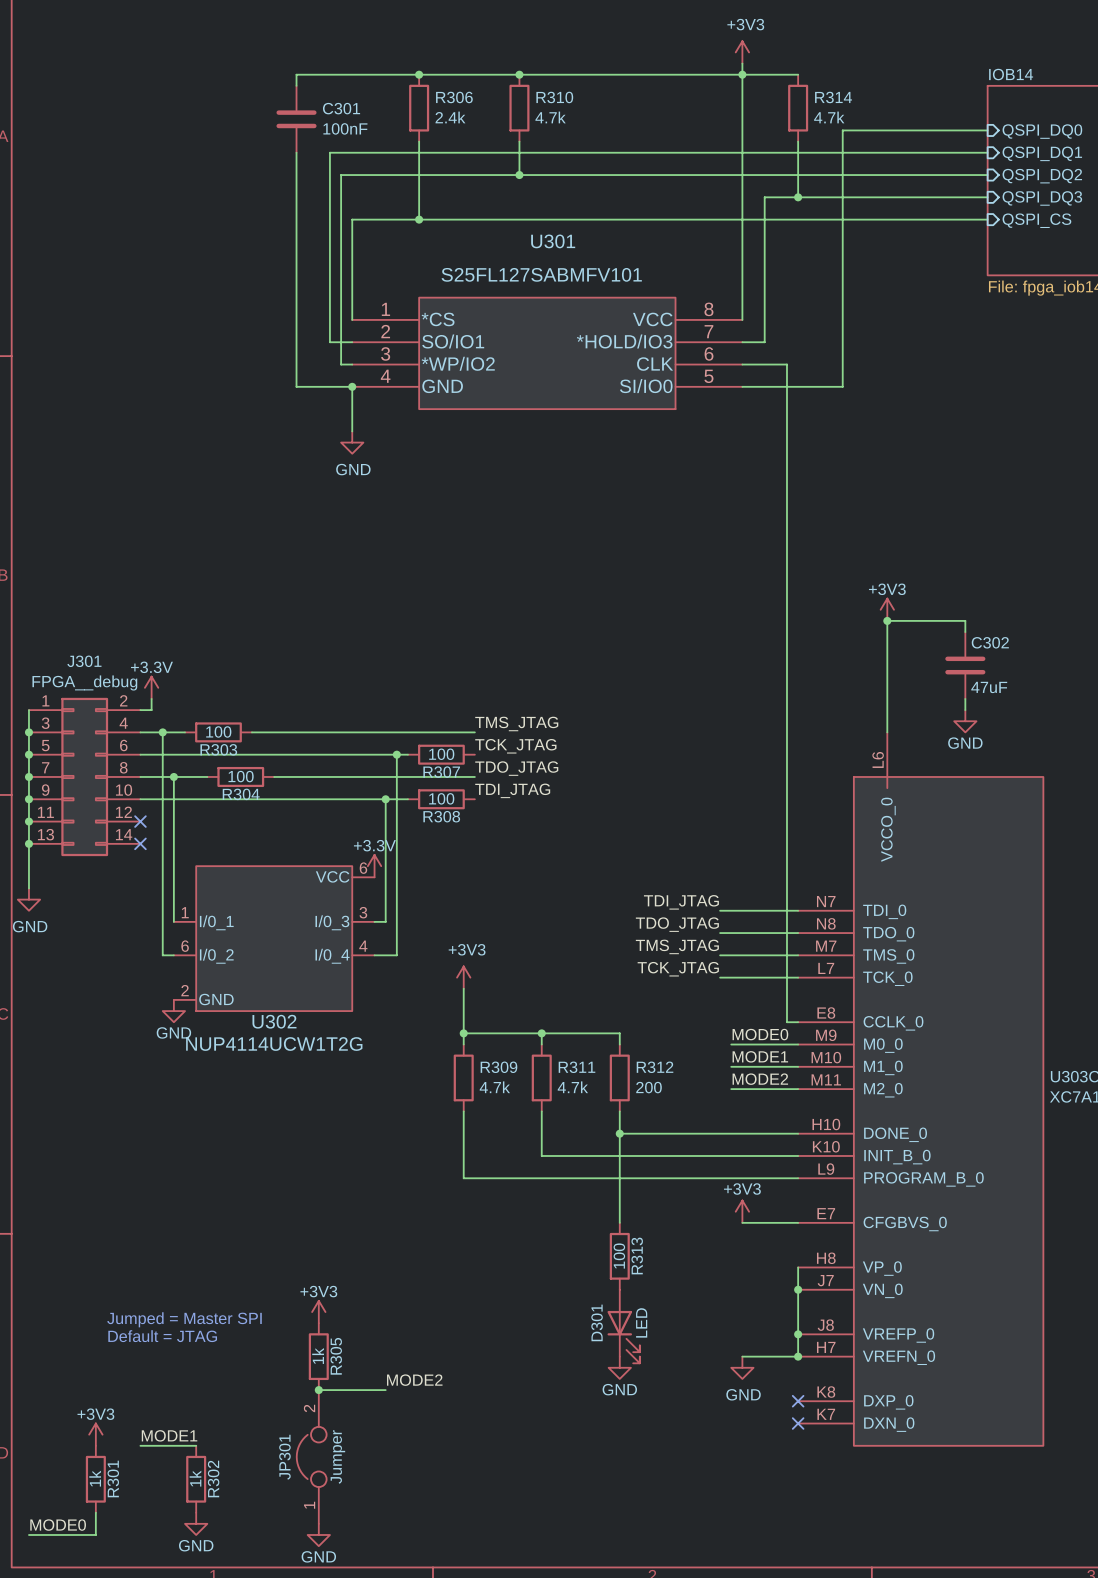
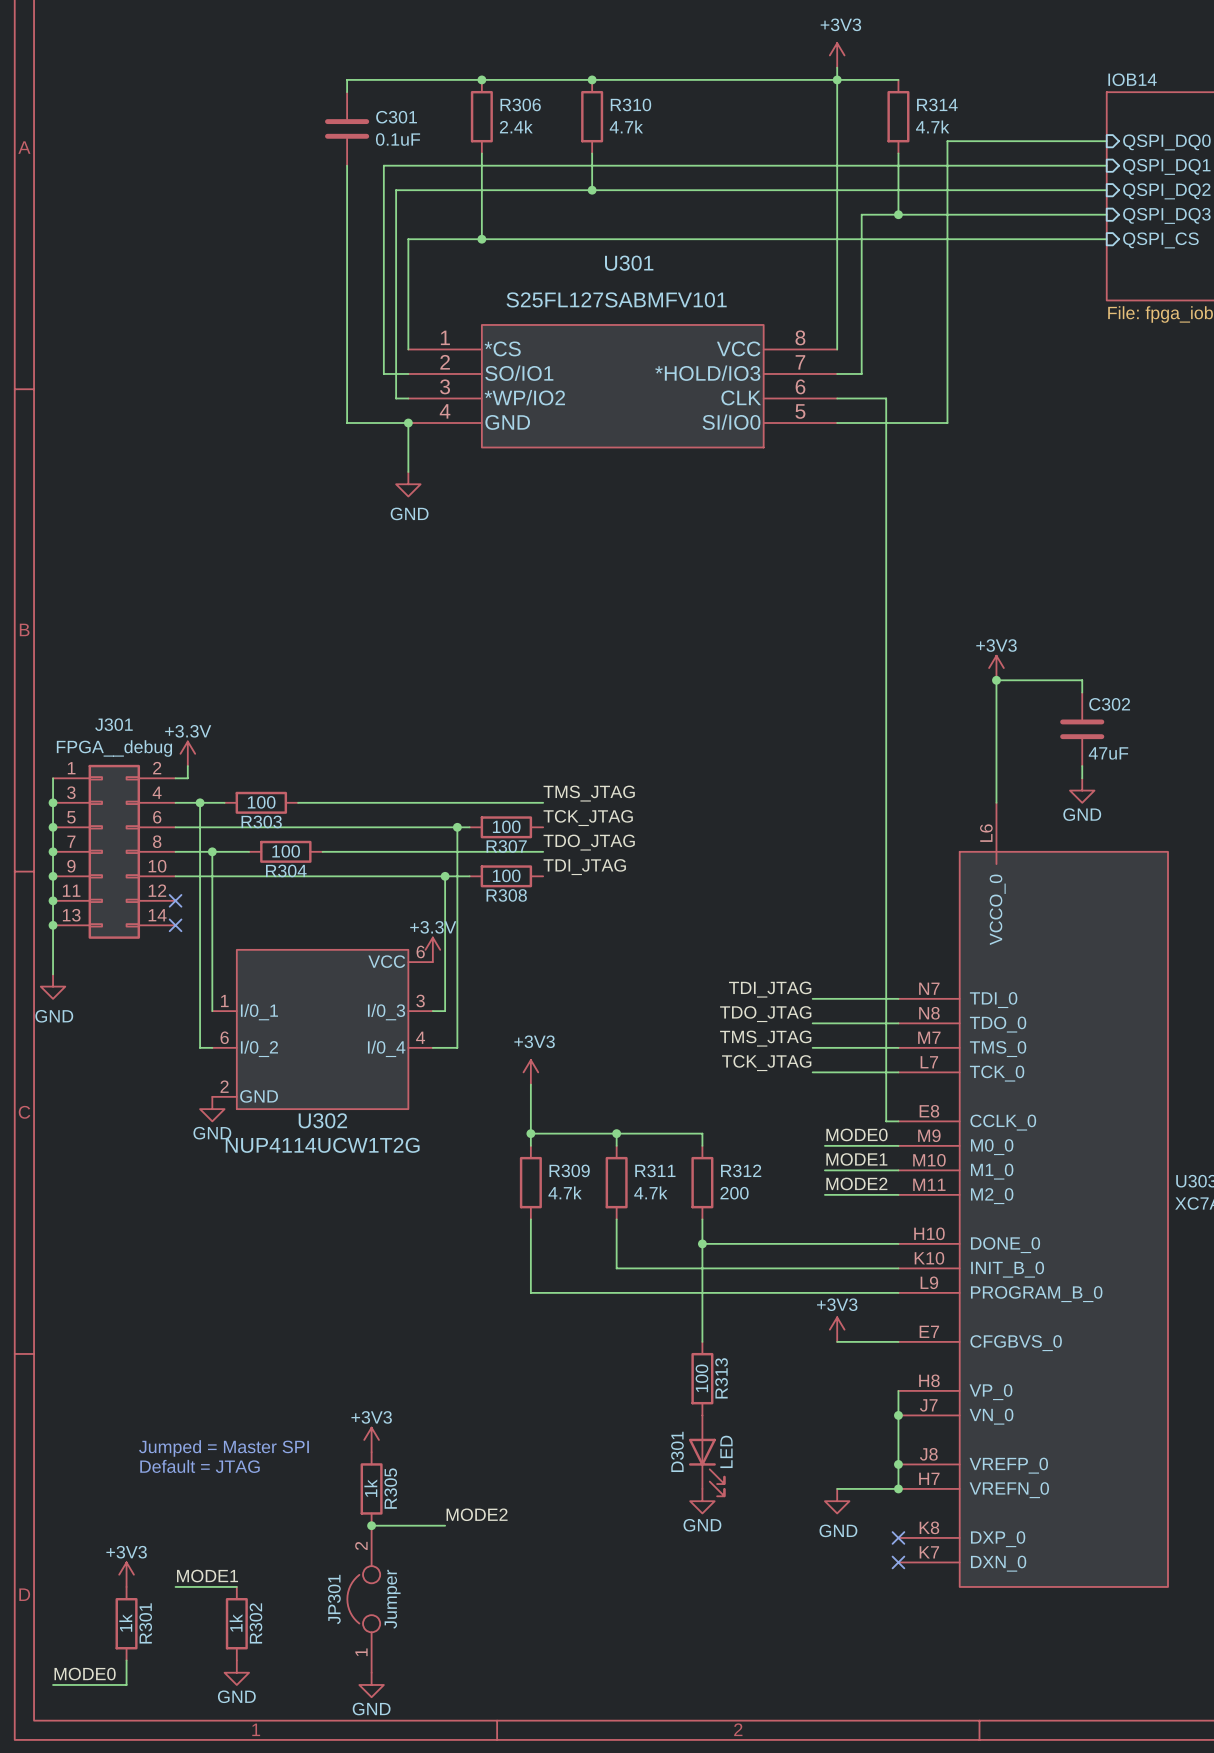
C301 value: 100nF (345, 128) -> 0.1uF (398, 139)

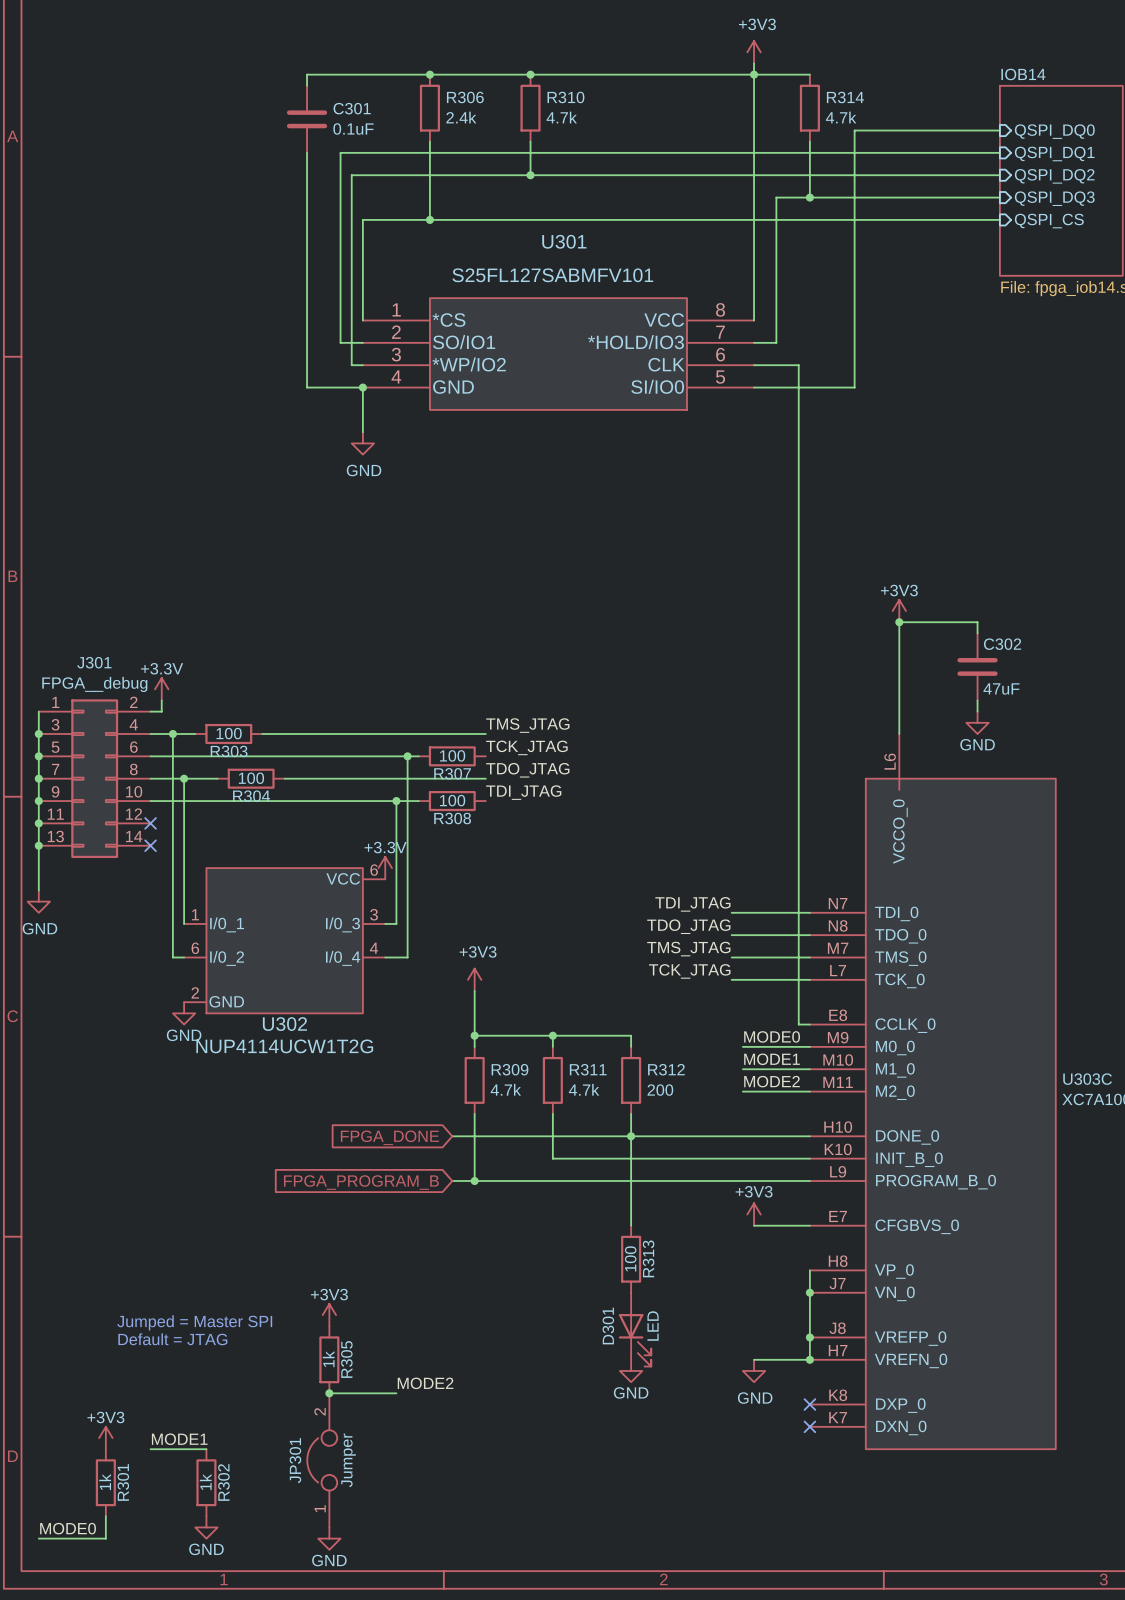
wire: none -> (452, 1136) (631, 1136)
global label: none -> FPGA_DONE (389, 1137)
wire: none -> (452, 1181) (474, 1181)
junction: none -> (474, 1181)
global label: none -> FPGA_PROGRAM_B (361, 1182)

